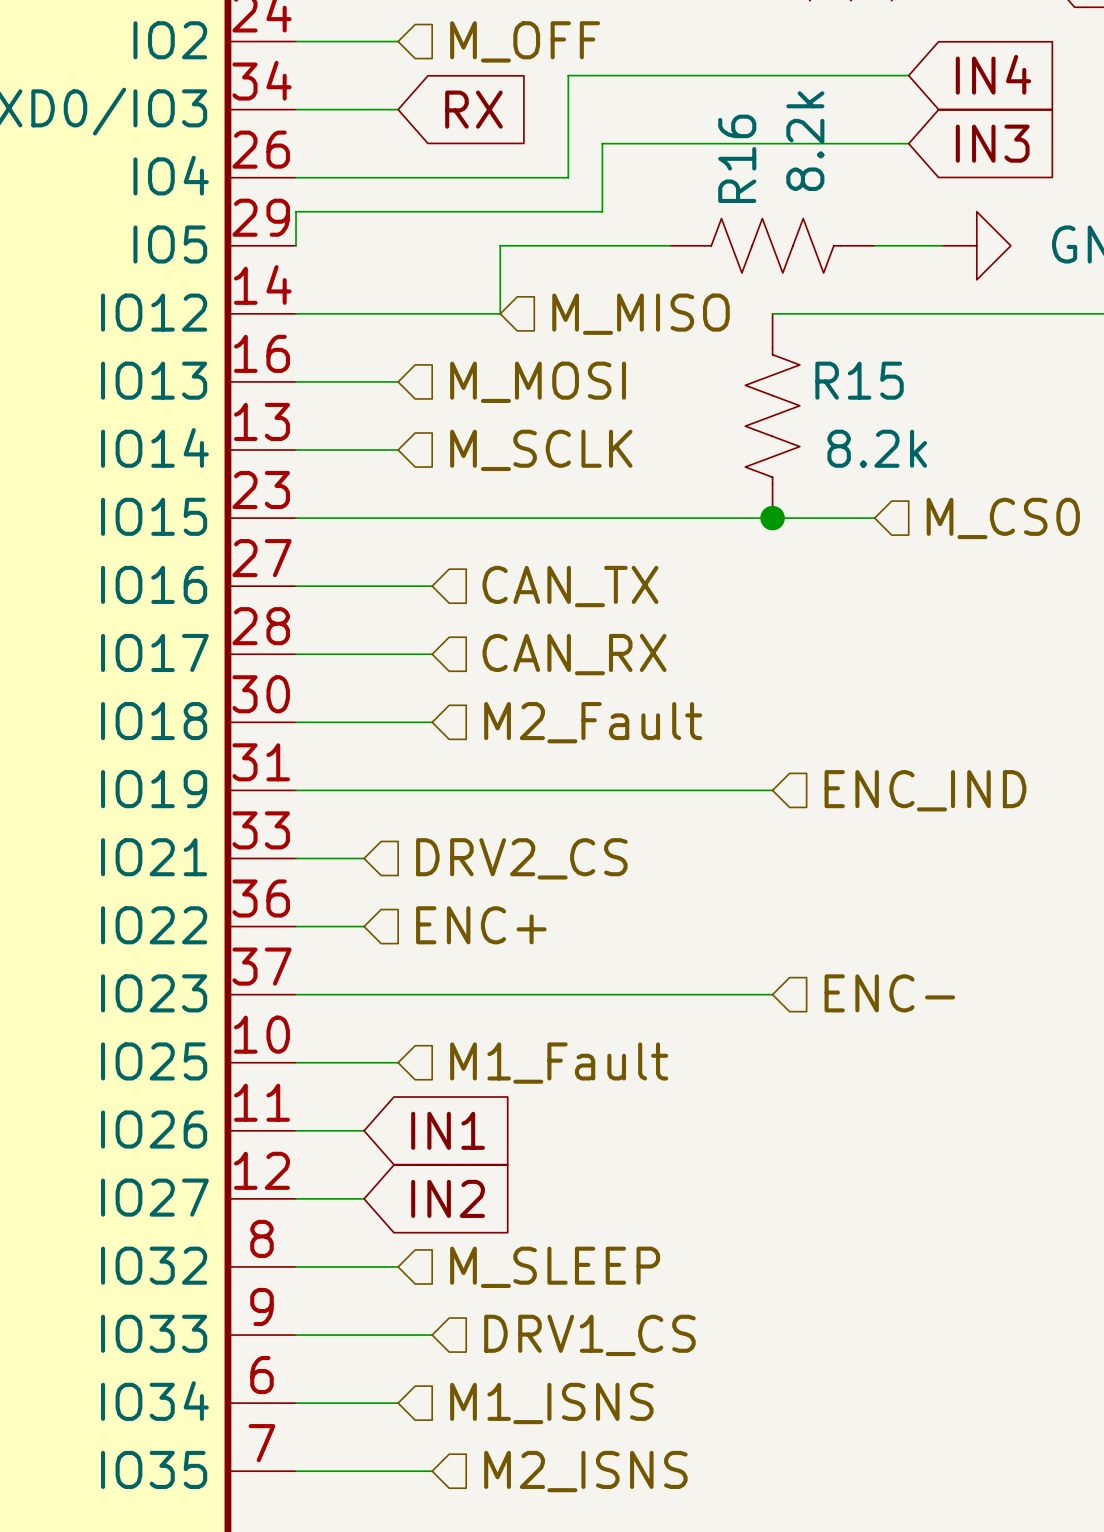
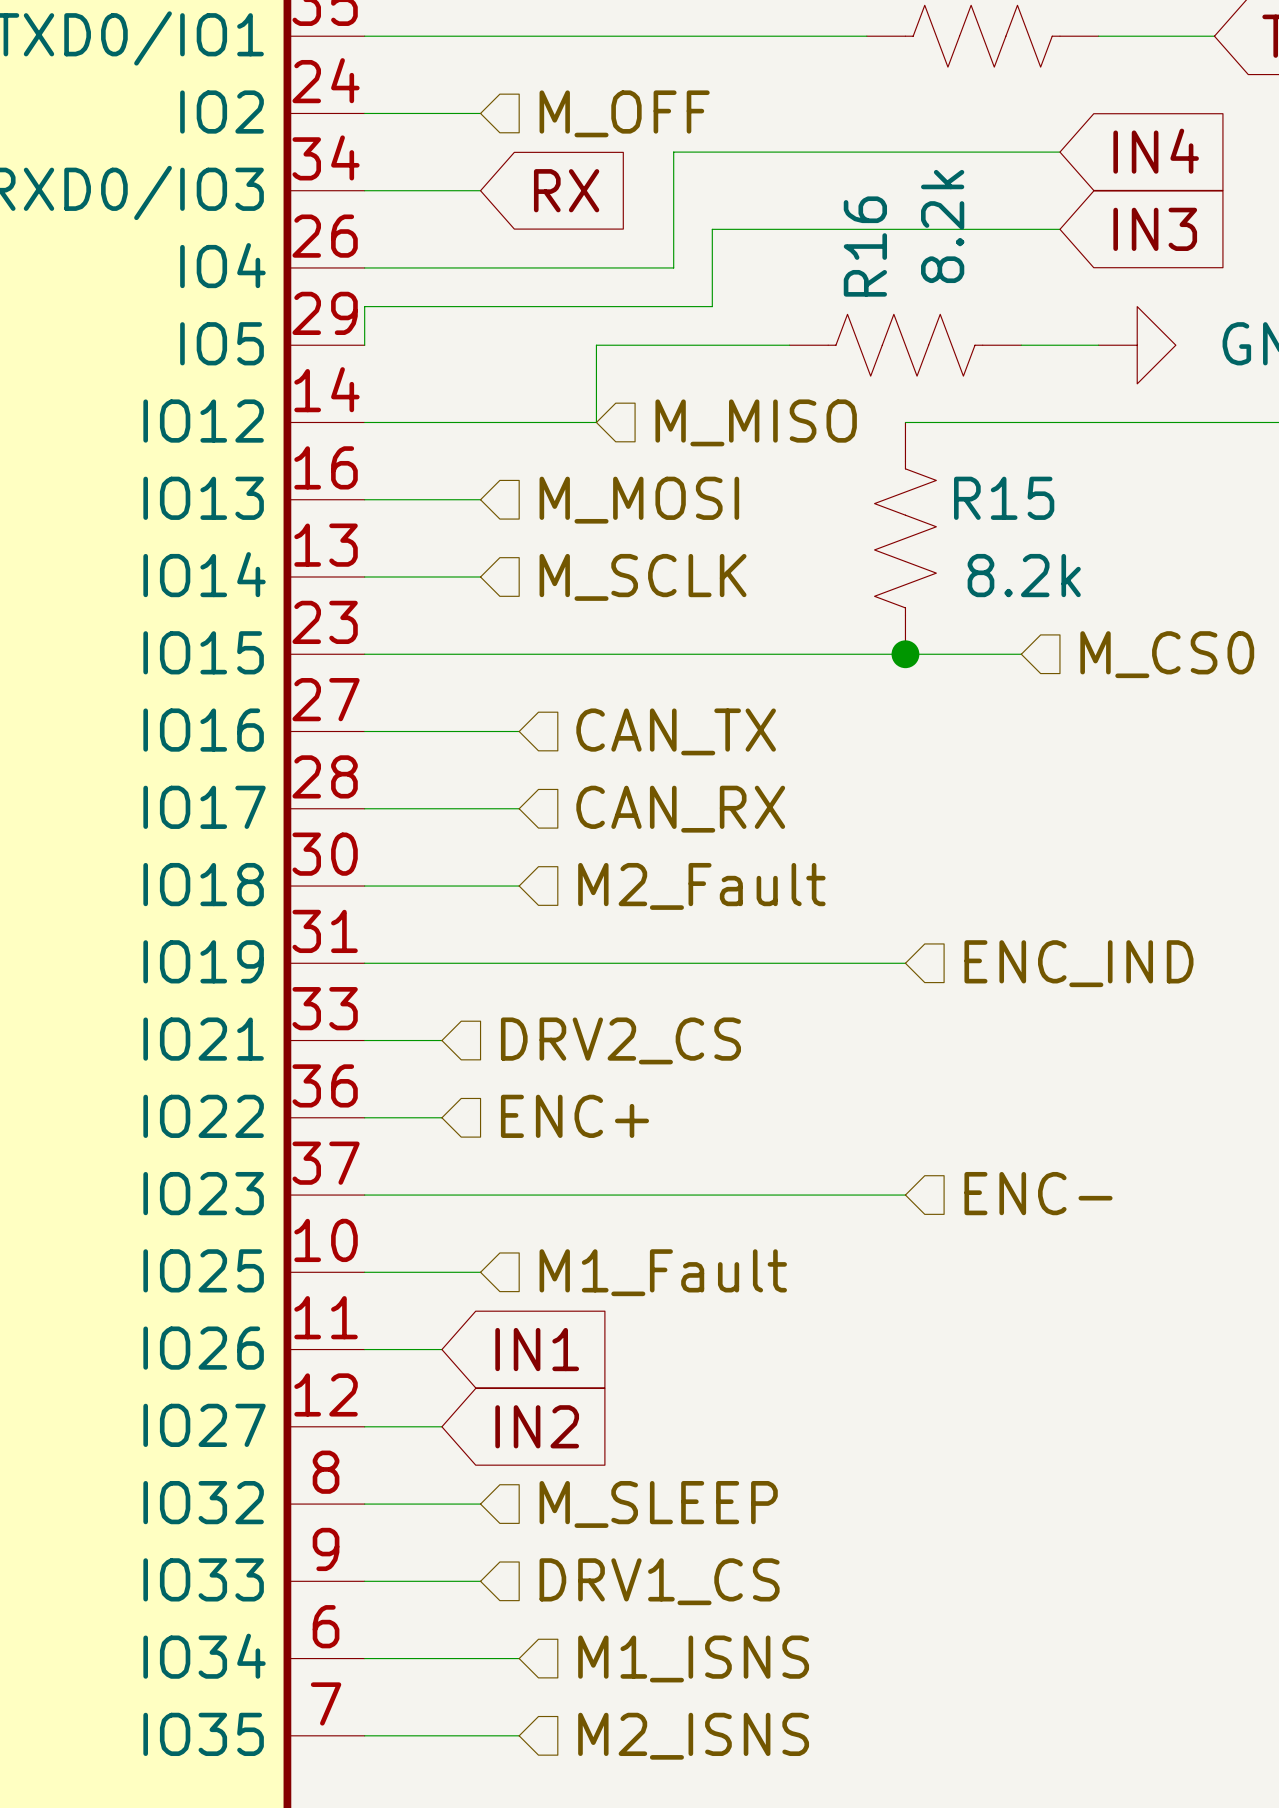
wire: (398, 1335) (432, 1335) -> (480, 1658) (519, 1658)
hierarchical label position: DRV1_CS (589, 1335) -> DRV1_CS (659, 1581)
hierarchical label position: M1_ISNS (551, 1403) -> M1_ISNS (693, 1658)

